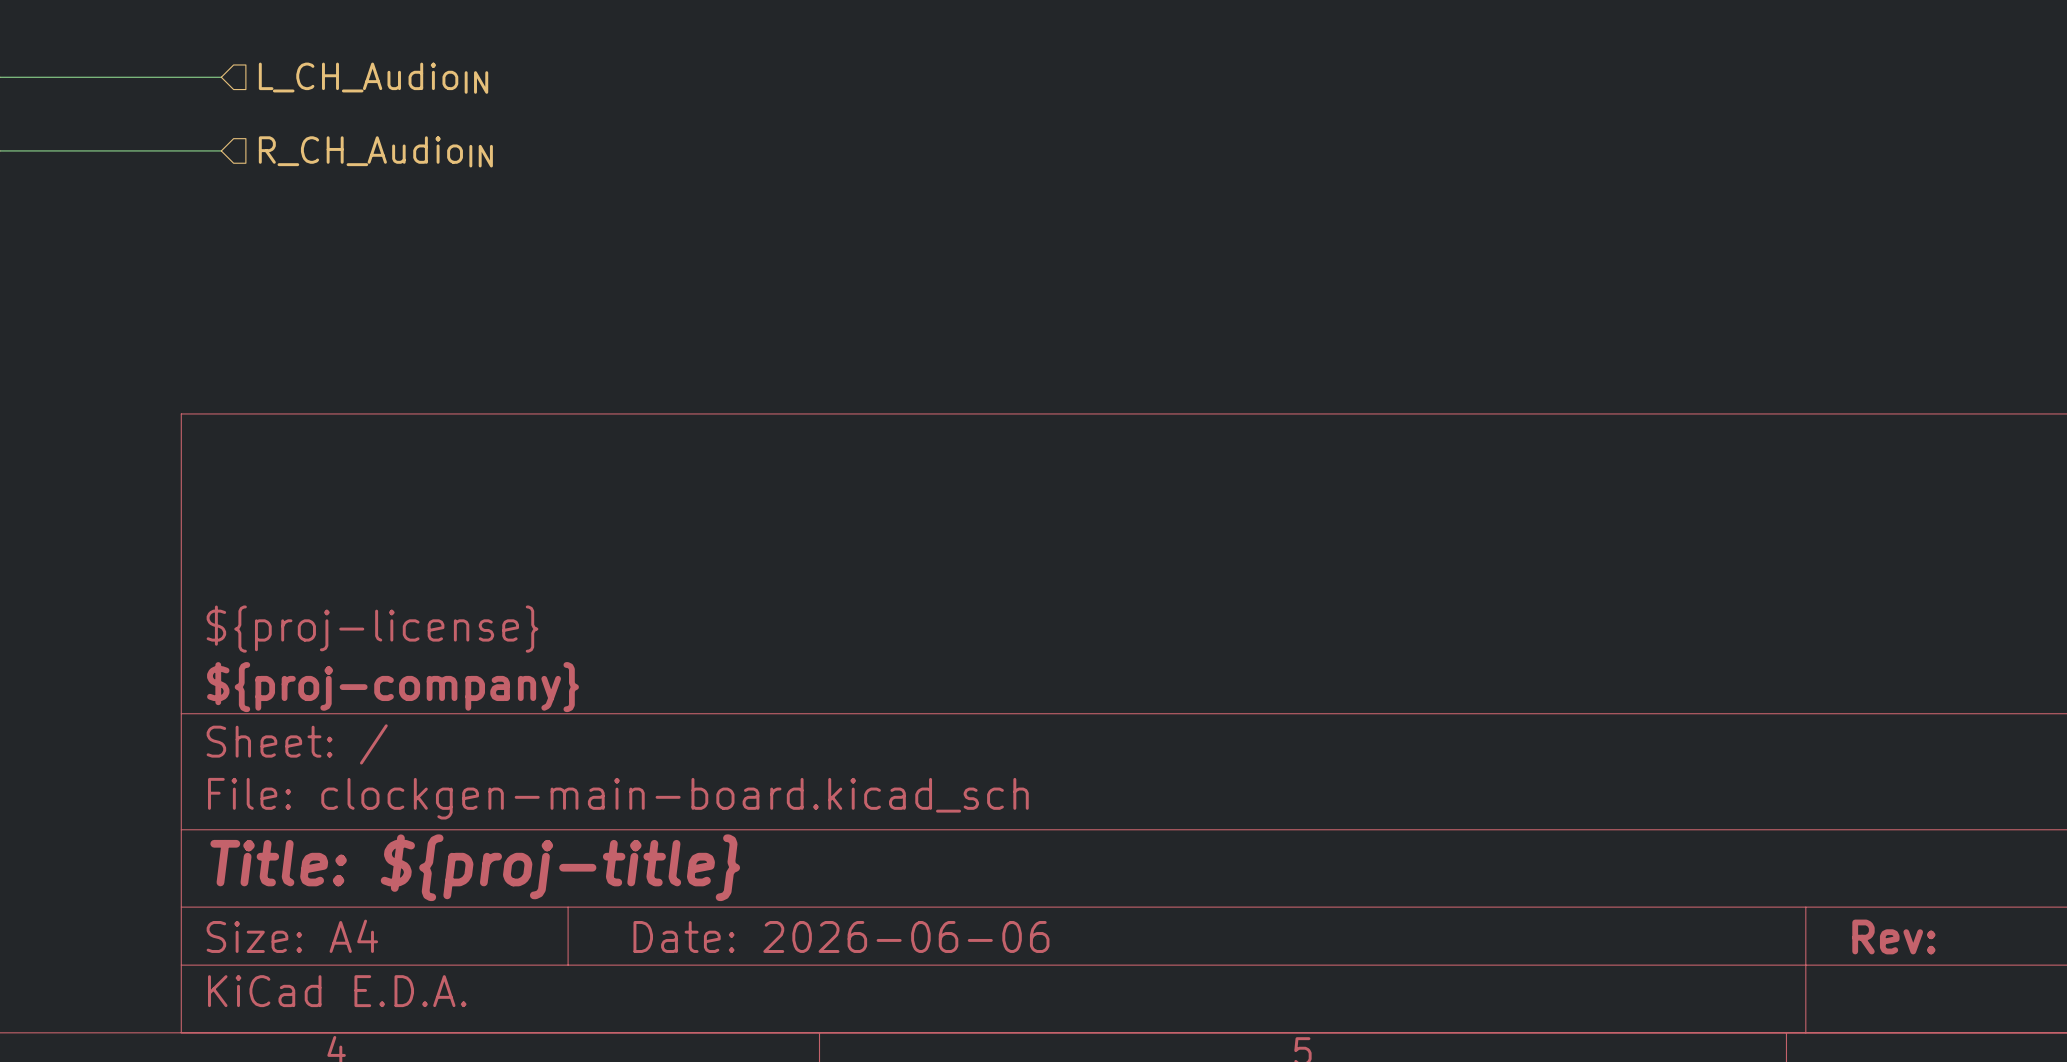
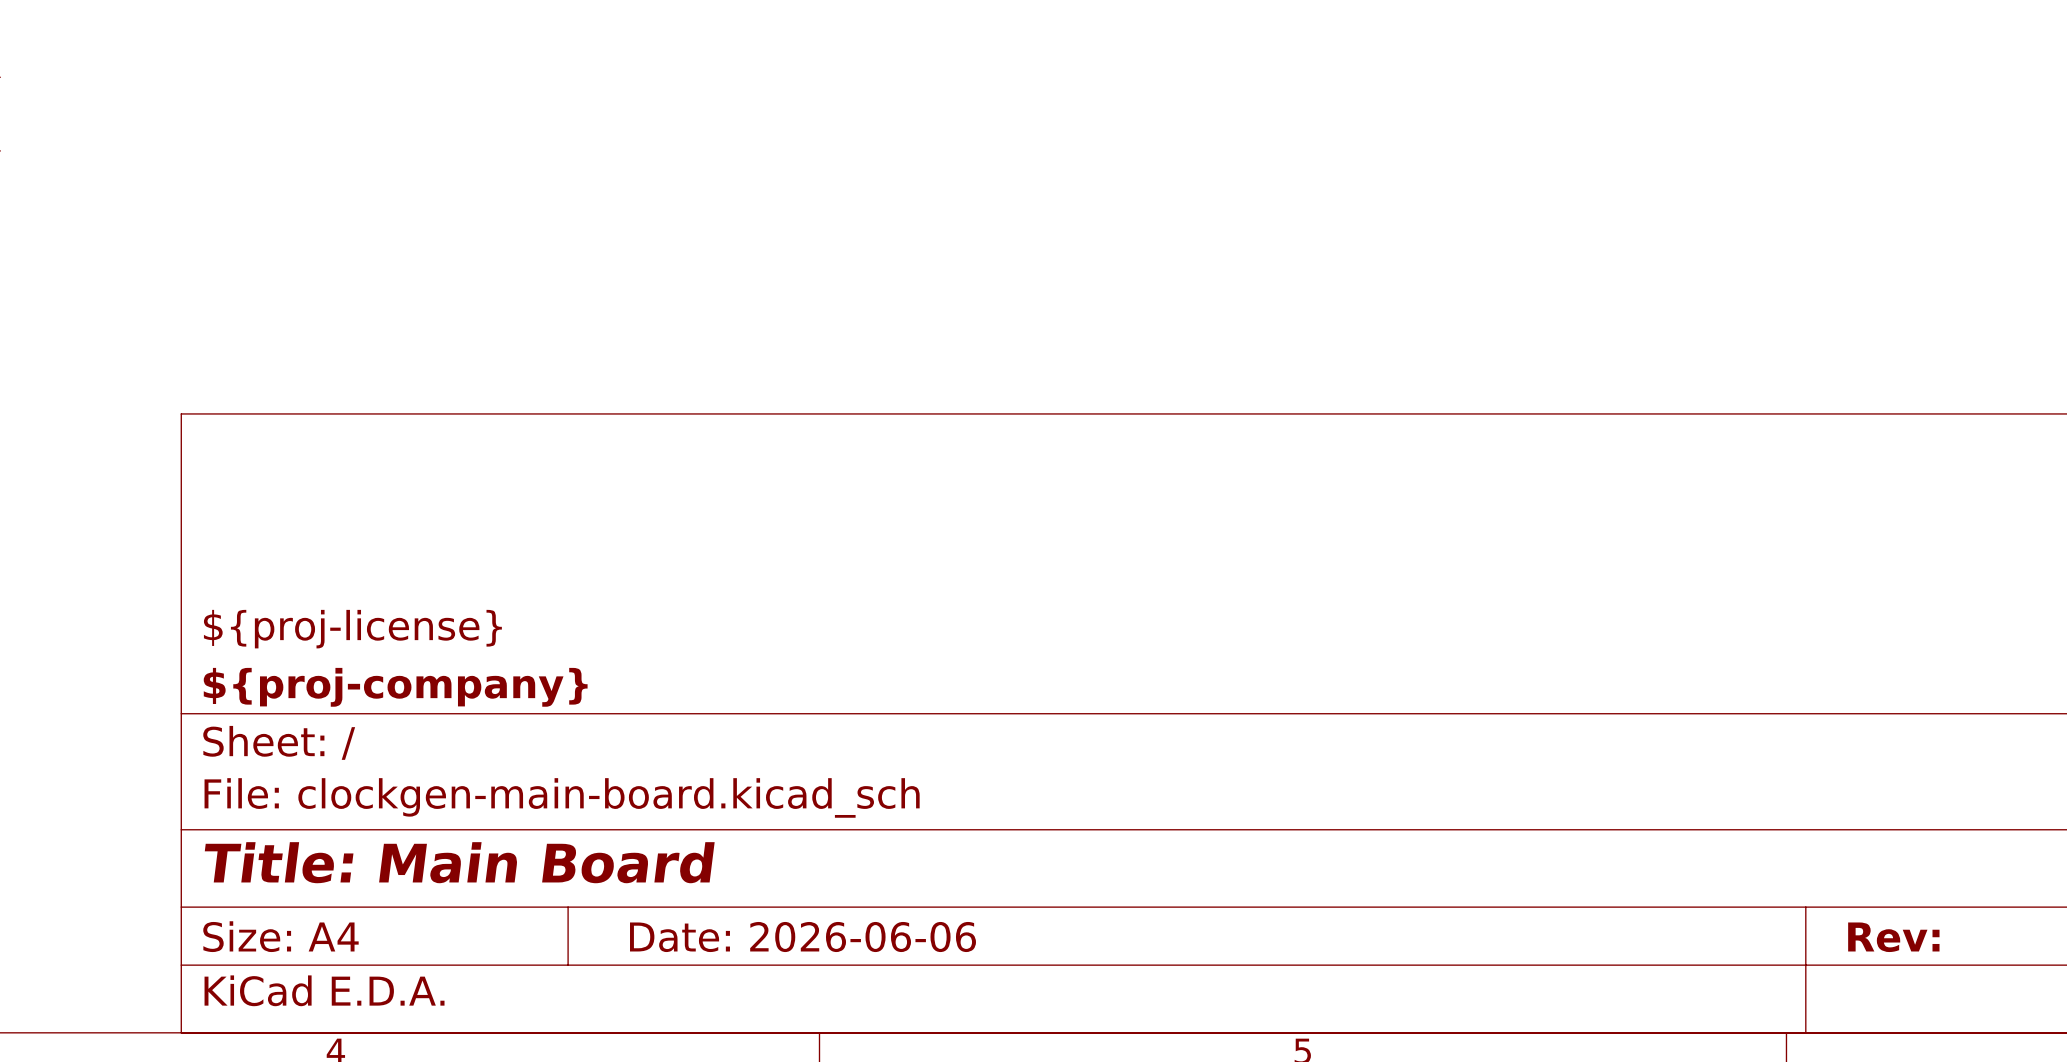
wire: (0, 77) (221, 77) -> none
hierarchical label: L_CH_AudioIN (373, 78) -> none
wire: (0, 150) (221, 150) -> none
hierarchical label: R_CH_AudioIN (375, 151) -> none
title block: Title: ${proj-title} (475, 867) -> Title: Main Board (459, 862)

